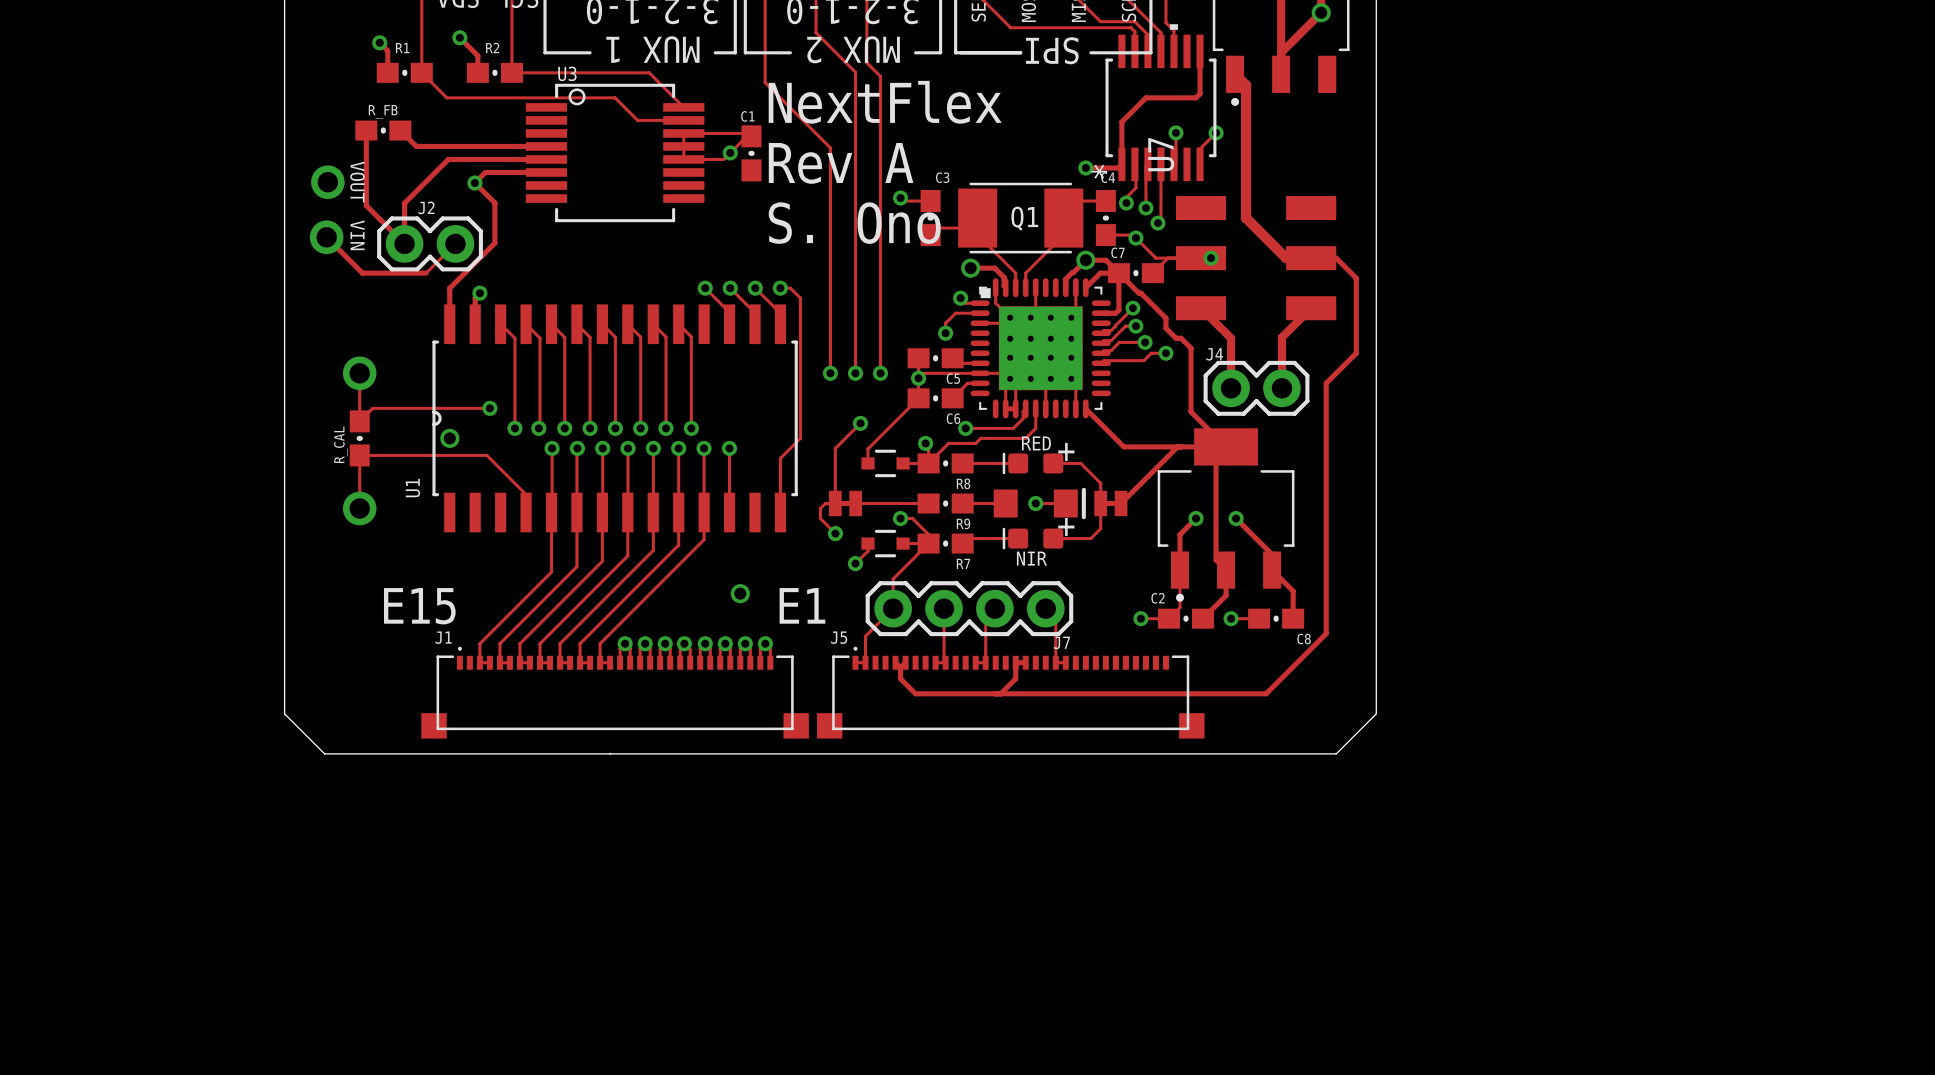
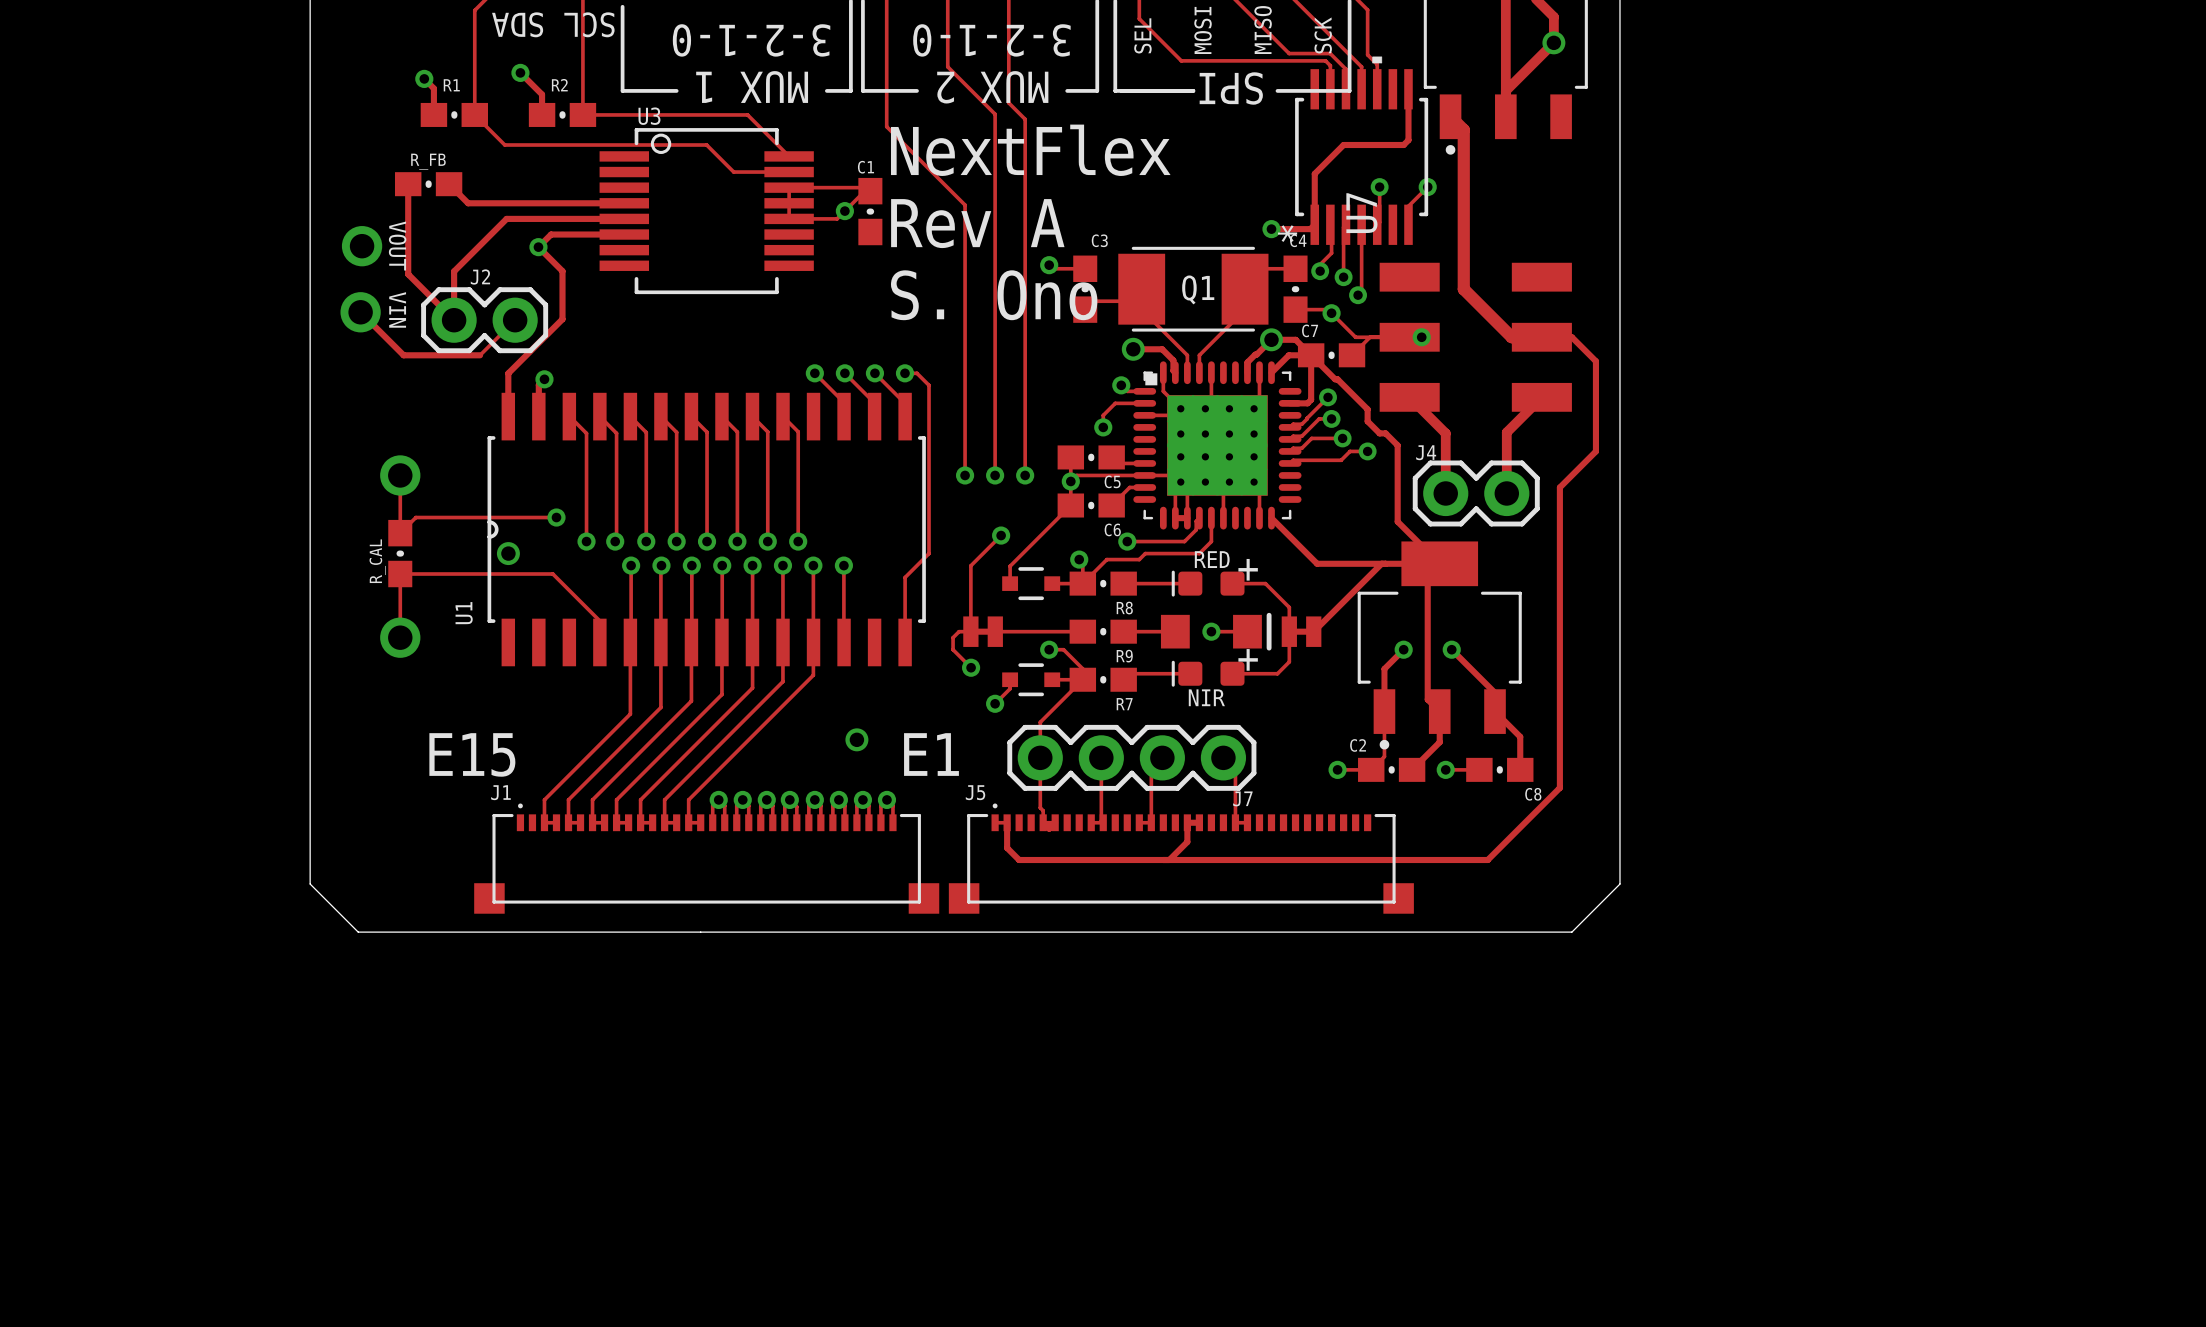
track: (893, 608) (865, 636) (865, 662) -> (1040, 757) (1040, 807) (1043, 810) (1043, 822) (1055, 822)
track: (900, 667) (900, 678) (915, 693) -> (1007, 822) (1007, 847) (1019, 860) (1067, 860)

